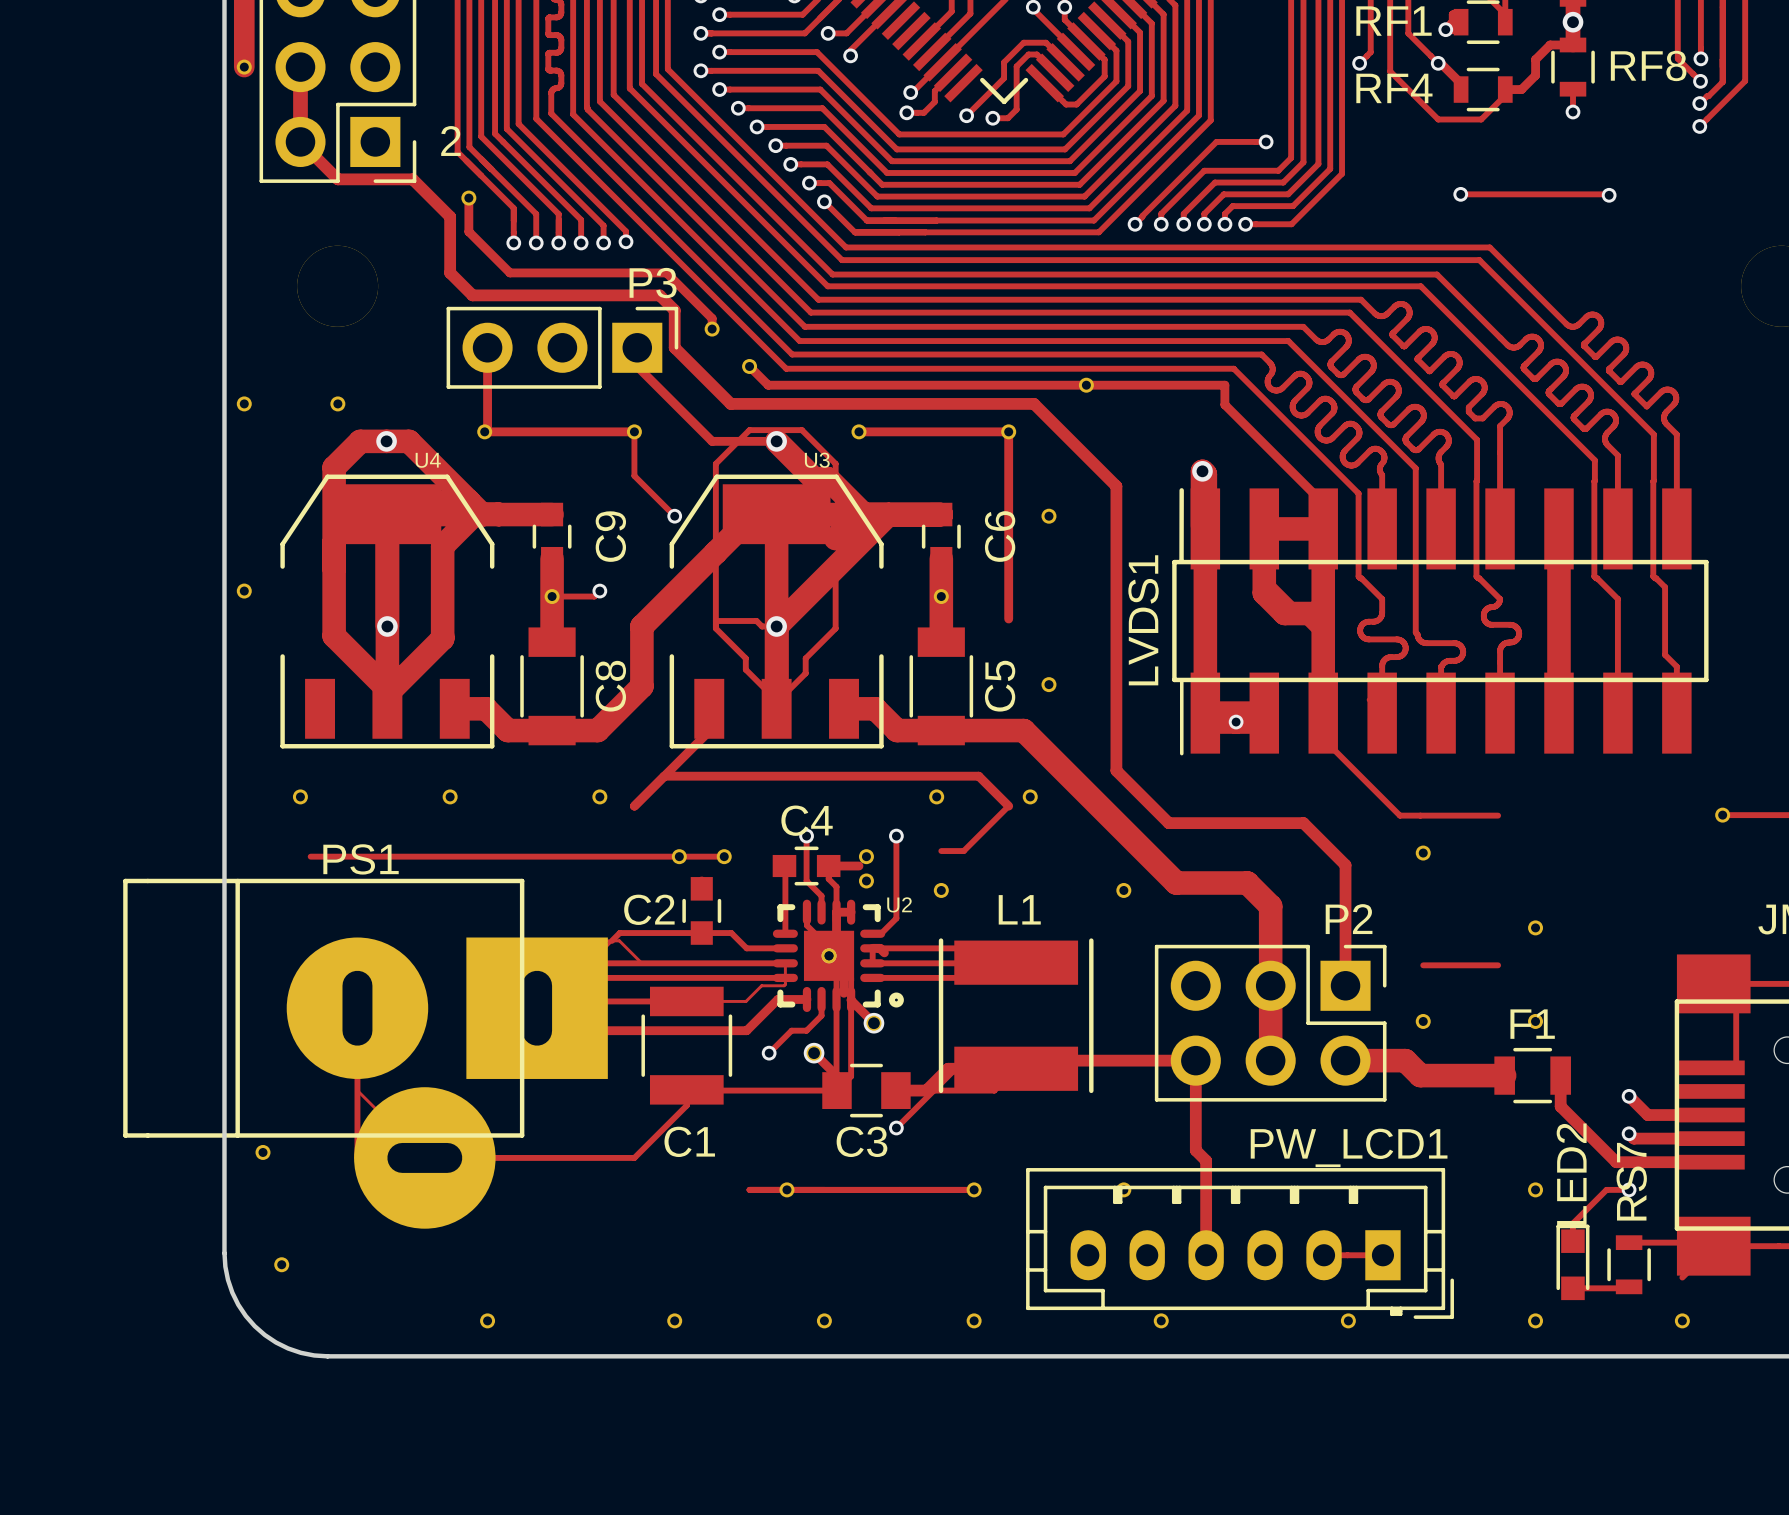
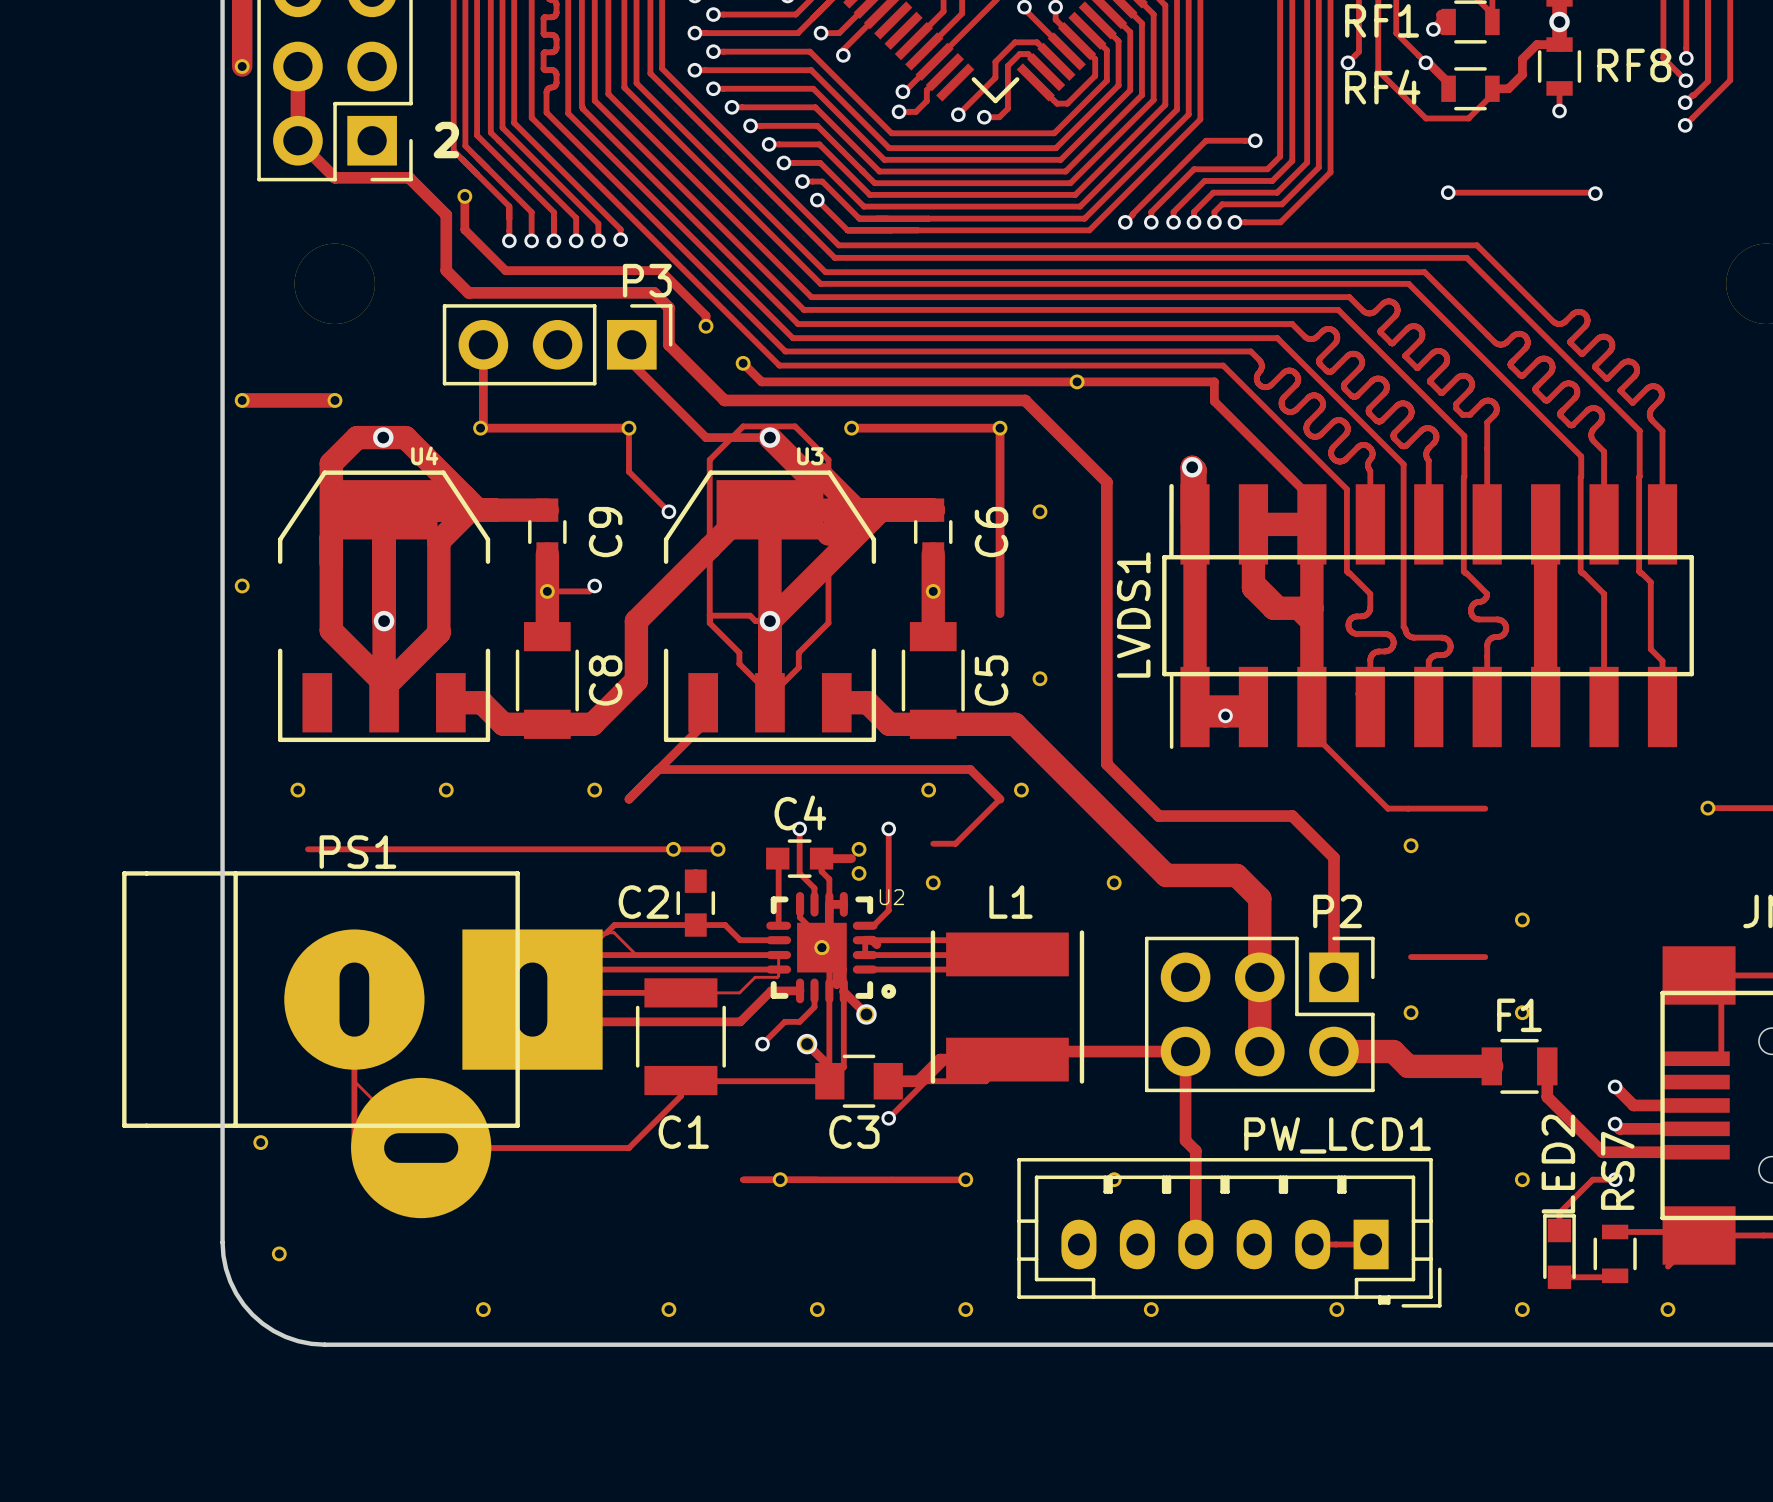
track: none -> (242, 400) (334, 400)

